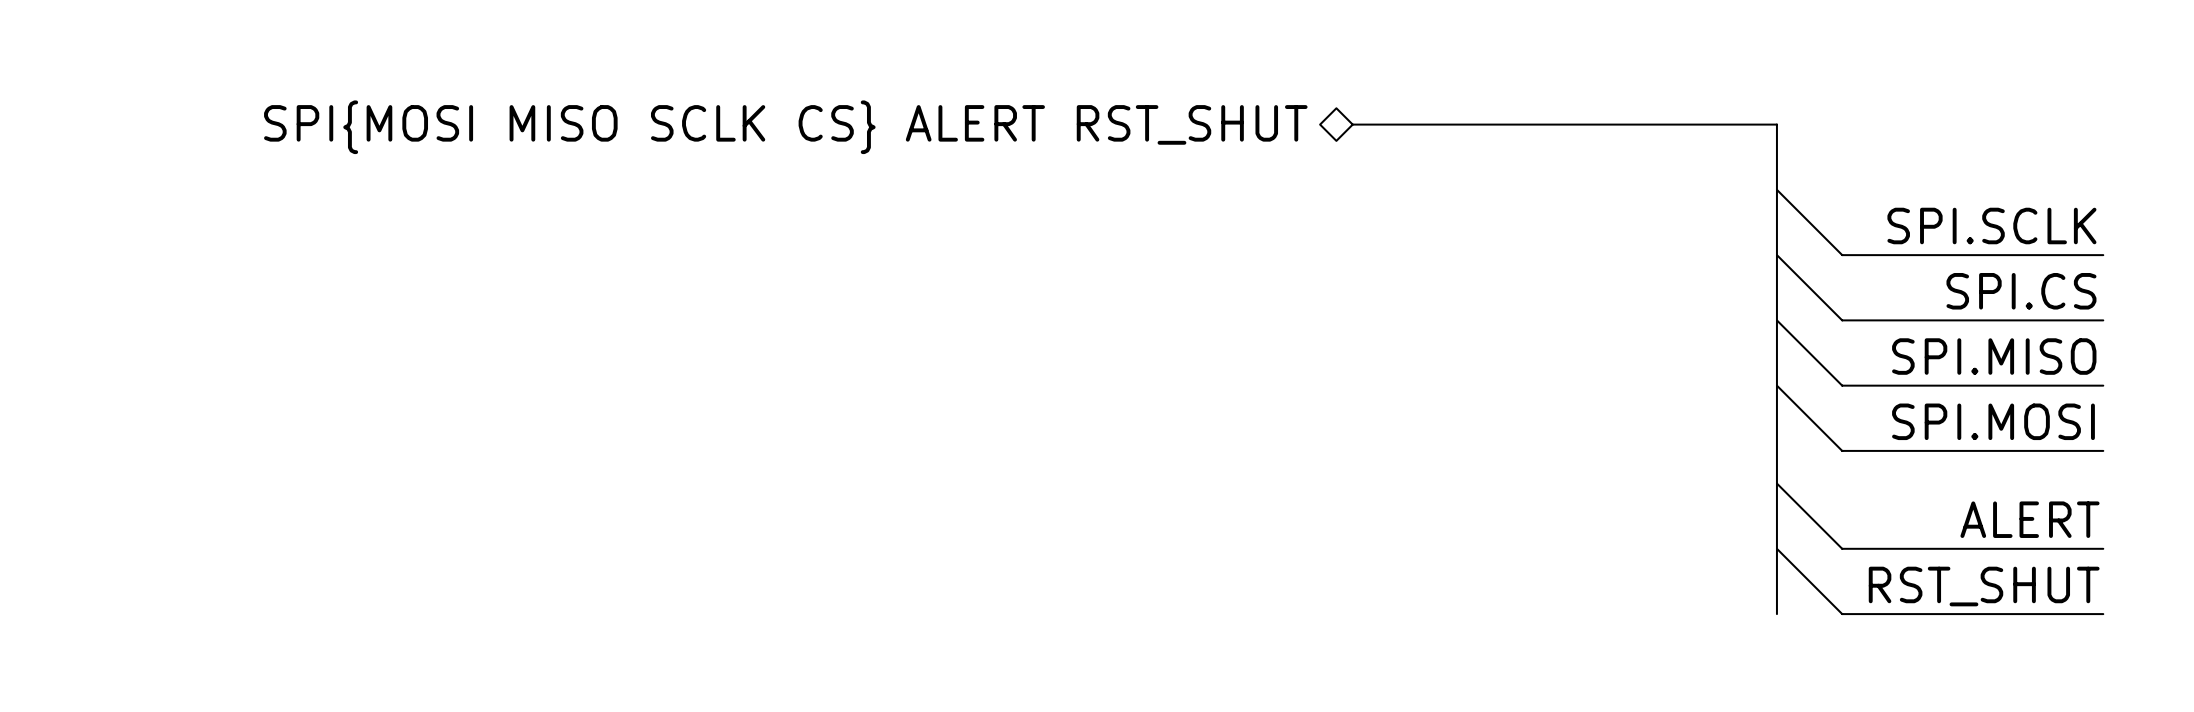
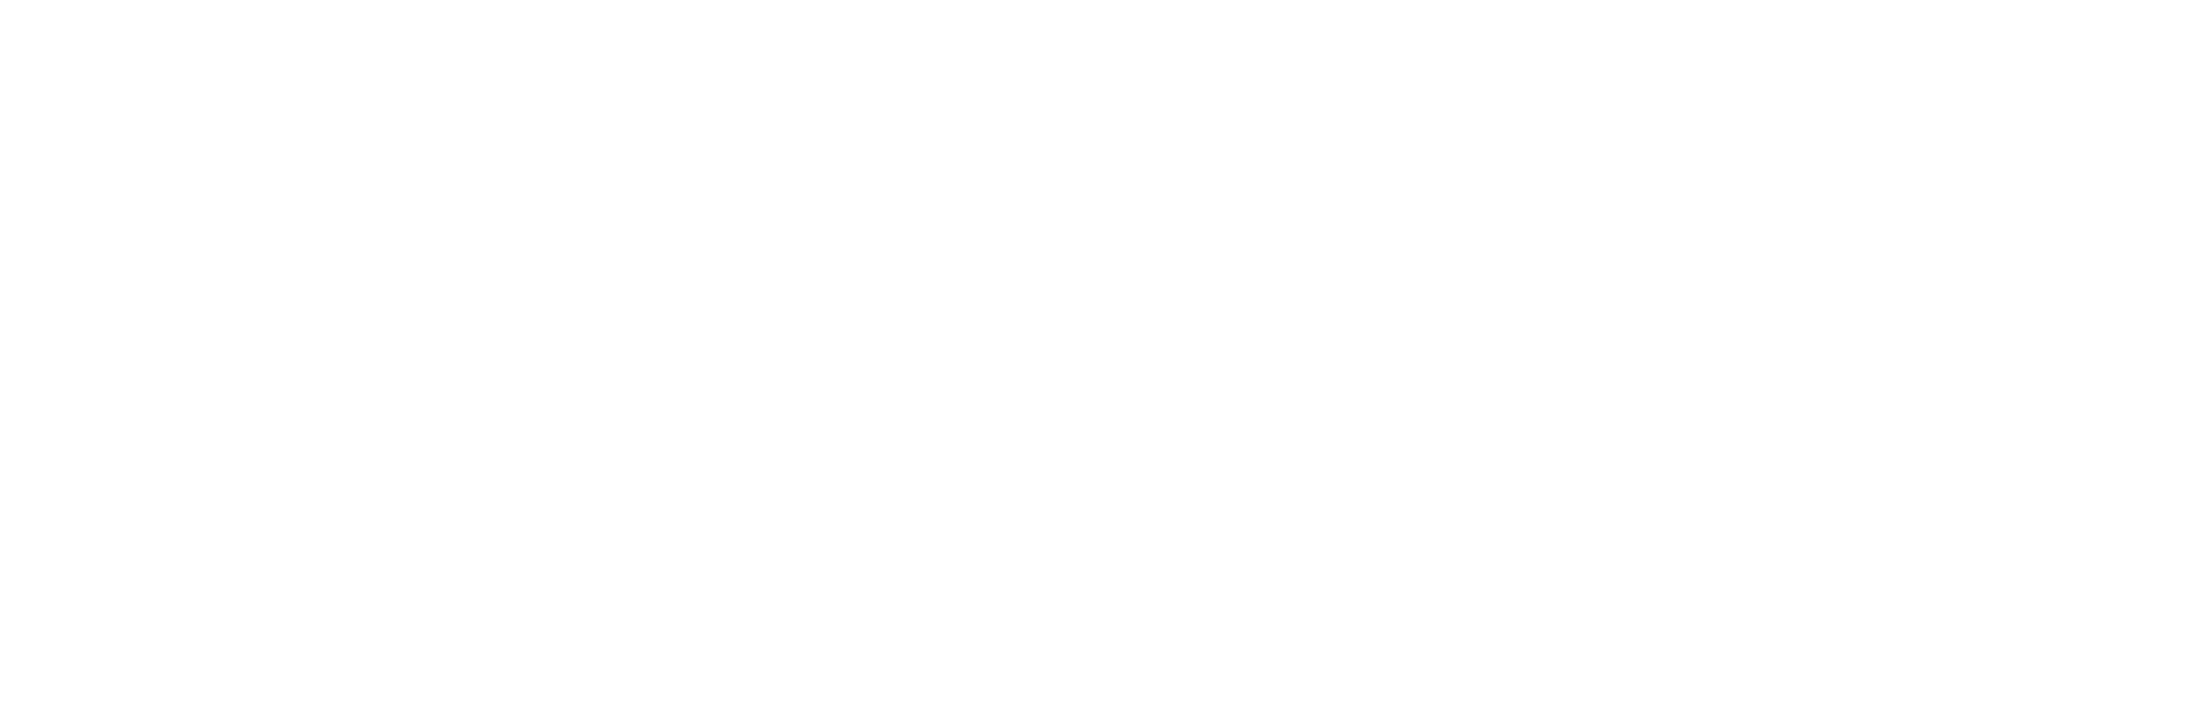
bus: (1352, 124) (1776, 124) (1776, 614) -> none
hierarchical label: SPI{MOSI MISO SCLK CS} ALERT RST_SHUT (785, 127) -> none
wire: (1776, 189) (1842, 255) (2103, 255) -> none
label: SPI.SCLK (1991, 226) -> none
wire: (1776, 255) (1842, 320) (2103, 320) -> none
label: SPI.CS (2021, 291) -> none
wire: (1776, 320) (1842, 385) (2103, 385) -> none
label: SPI.MISO (1994, 356) -> none
wire: (1776, 385) (1842, 450) (2103, 450) -> none
label: SPI.MOSI (1993, 421) -> none
wire: (1776, 483) (1842, 548) (2103, 548) -> none
label: ALERT (2030, 519) -> none
wire: (1776, 548) (1842, 614) (2103, 614) -> none
label: RST_SHUT (1984, 586) -> none

